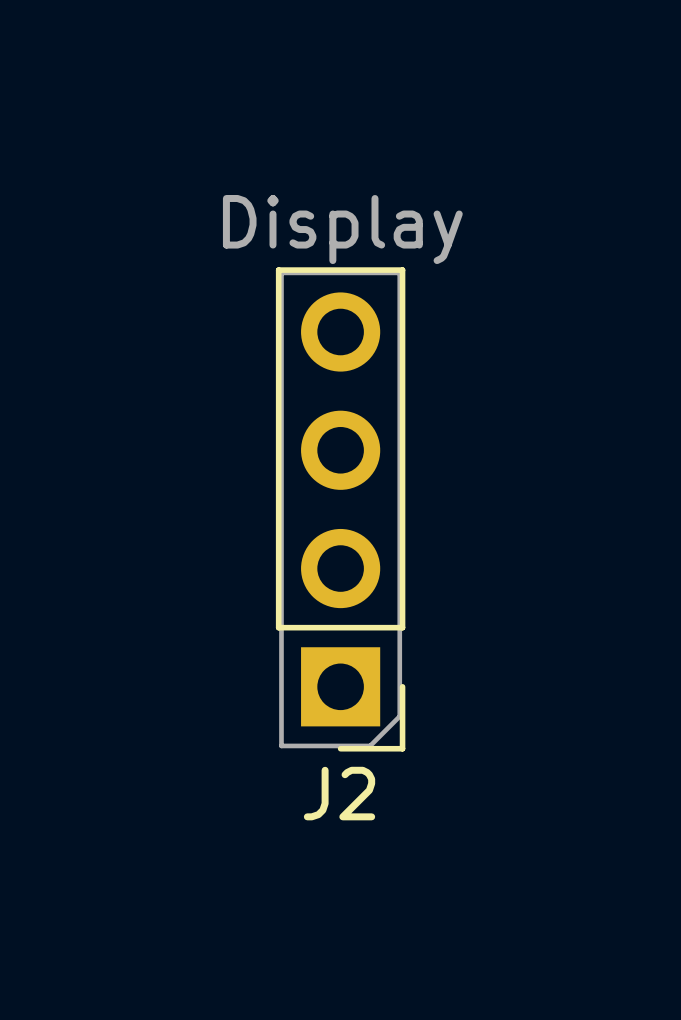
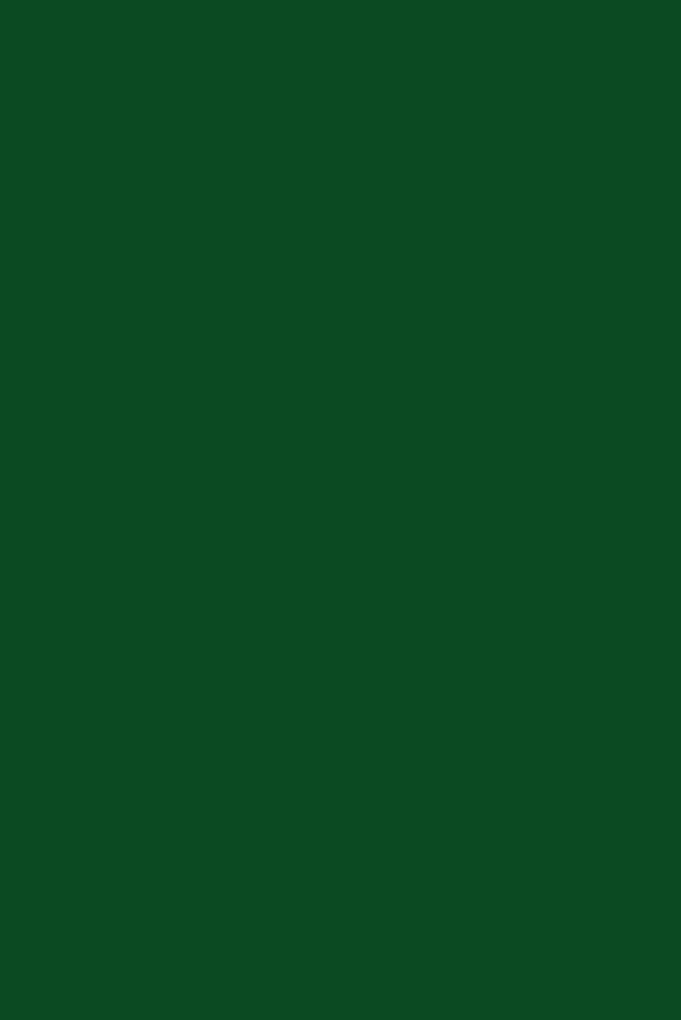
J2: Display (340, 509) -> none

